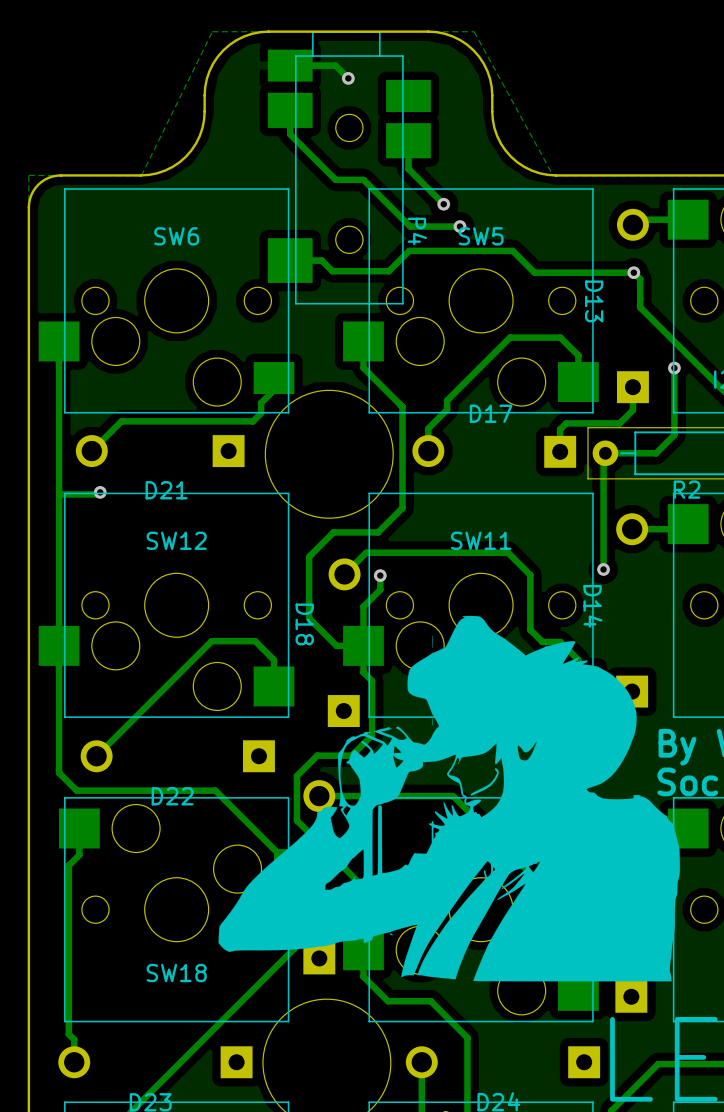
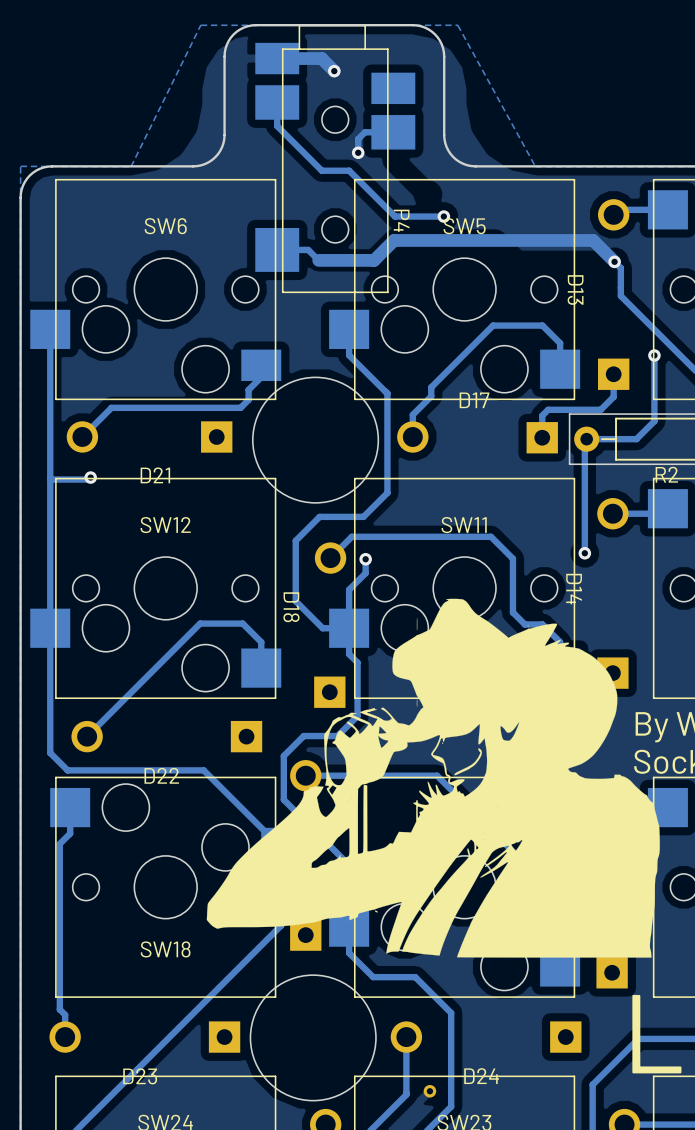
board edge: (268, 31) (244, 36) (223, 50) (213, 63) (206, 78) (204, 119) (196, 143) (185, 156) (172, 166) (157, 173) (140, 175) -> (255, 25) (247, 26) (236, 31) (231, 37) (225, 48) (224, 139) (222, 146) (215, 157) (208, 162) (197, 166) (130, 166)
board edge: (428, 31) (452, 36) (473, 50) (483, 63) (490, 78) (492, 119) (500, 143) (510, 156) (524, 166) (539, 173) (556, 175) -> (412, 25) (420, 26) (431, 31) (437, 37) (443, 48) (444, 139) (446, 146) (453, 157) (459, 162) (471, 166) (538, 166)
track width: thin (290, 65) (335, 65) (348, 78) -> thick (277, 58) (321, 58) (334, 71)
track: (408, 140) (408, 168) (443, 204) -> (393, 132) (364, 132) (358, 139) (358, 152)
via position: (443, 204) -> (358, 152)
track: (512, 250) (534, 272) (633, 272) -> (495, 240) (593, 240) (614, 261)
track width: thin (512, 250) (409, 250) (388, 271) (332, 271) -> thick (495, 240) (394, 240) (374, 260) (318, 260)

